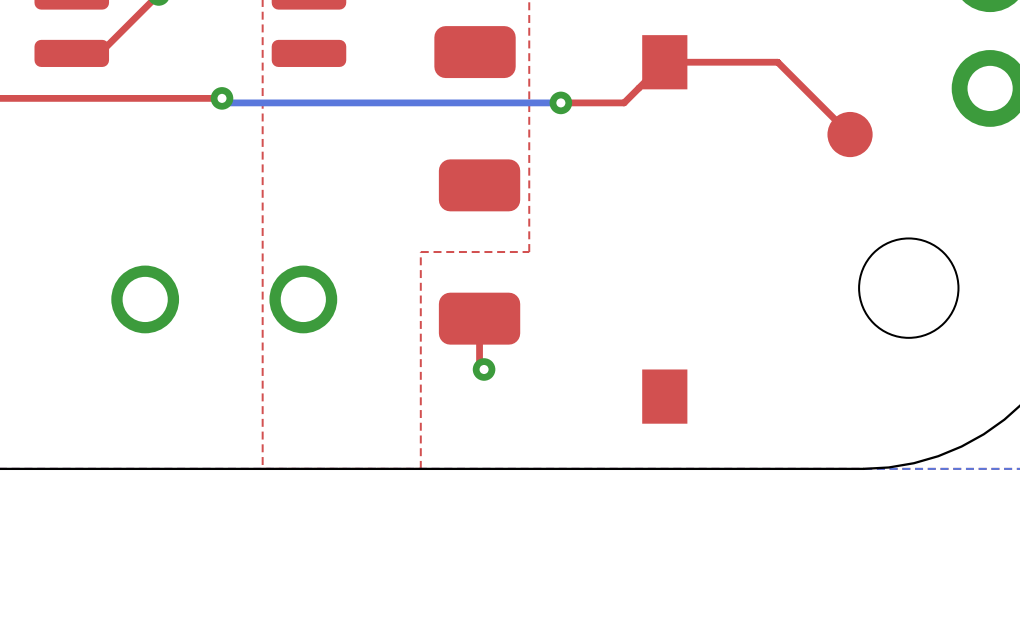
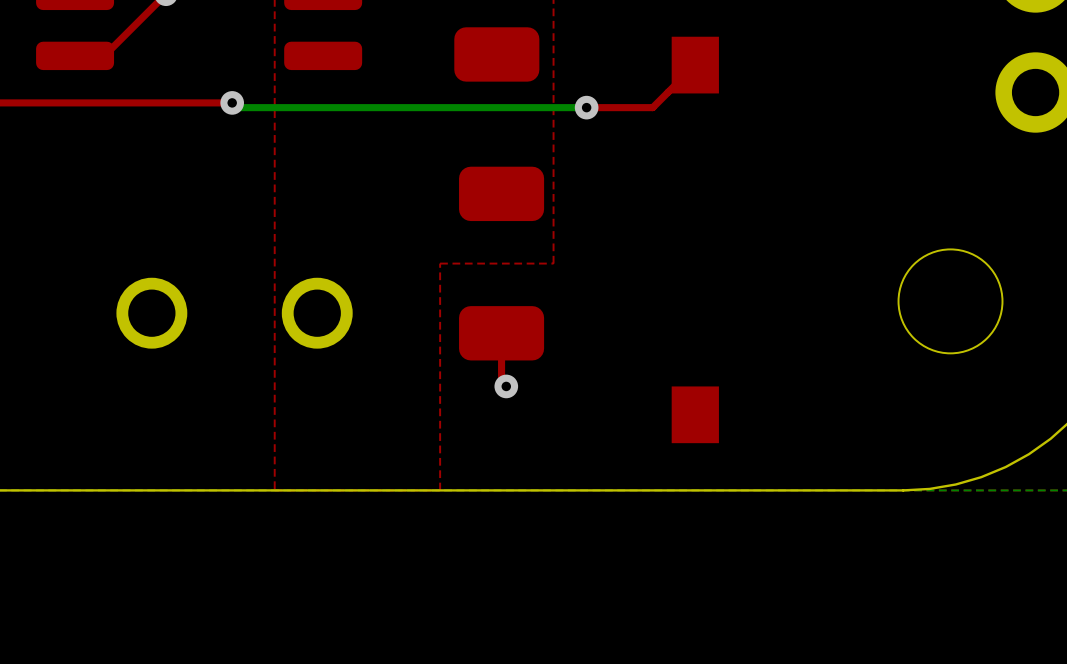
top track: (664, 62) (777, 62) (850, 134) -> none
part: (850, 134) -> none

